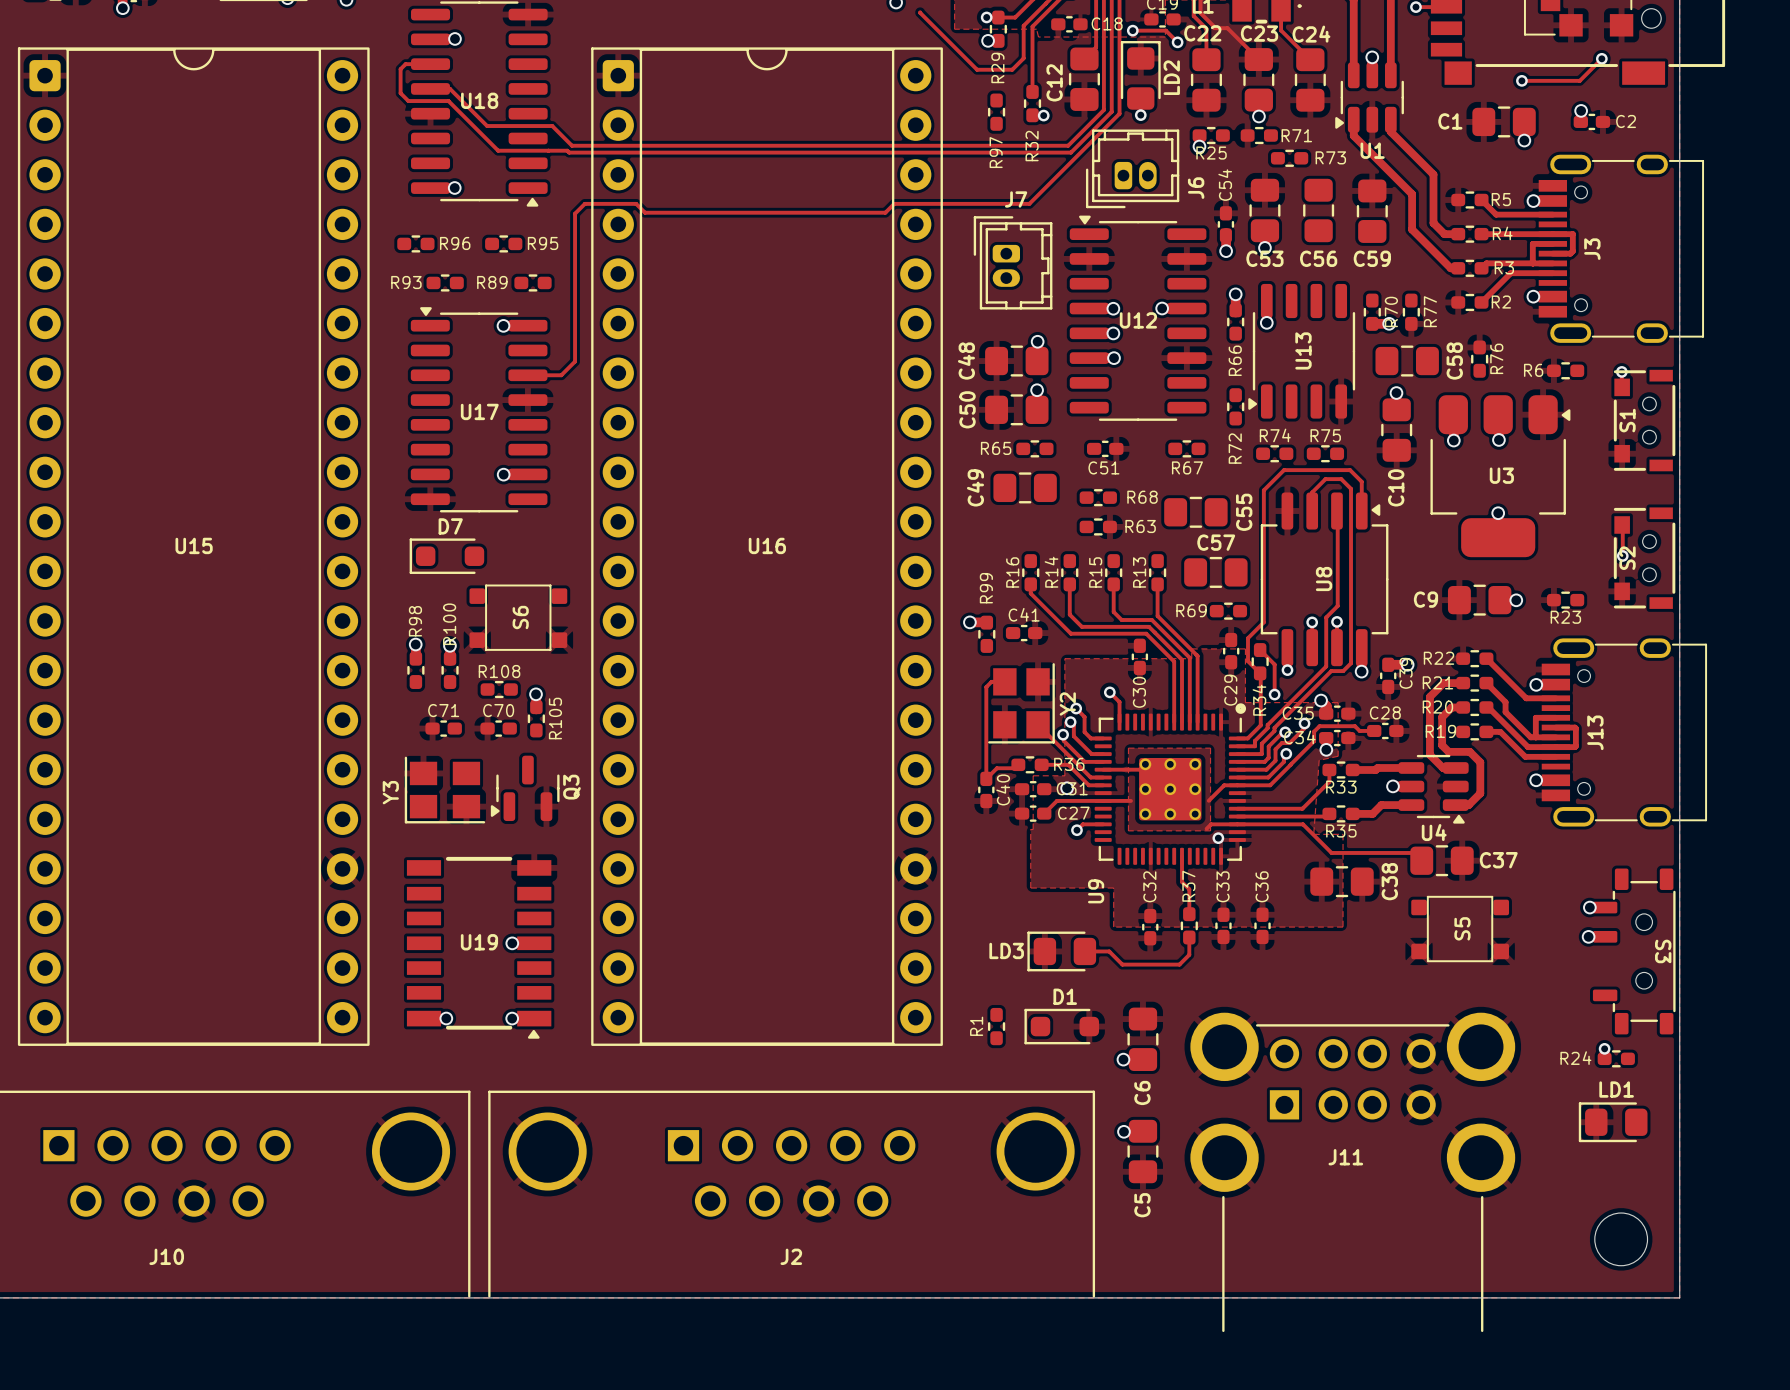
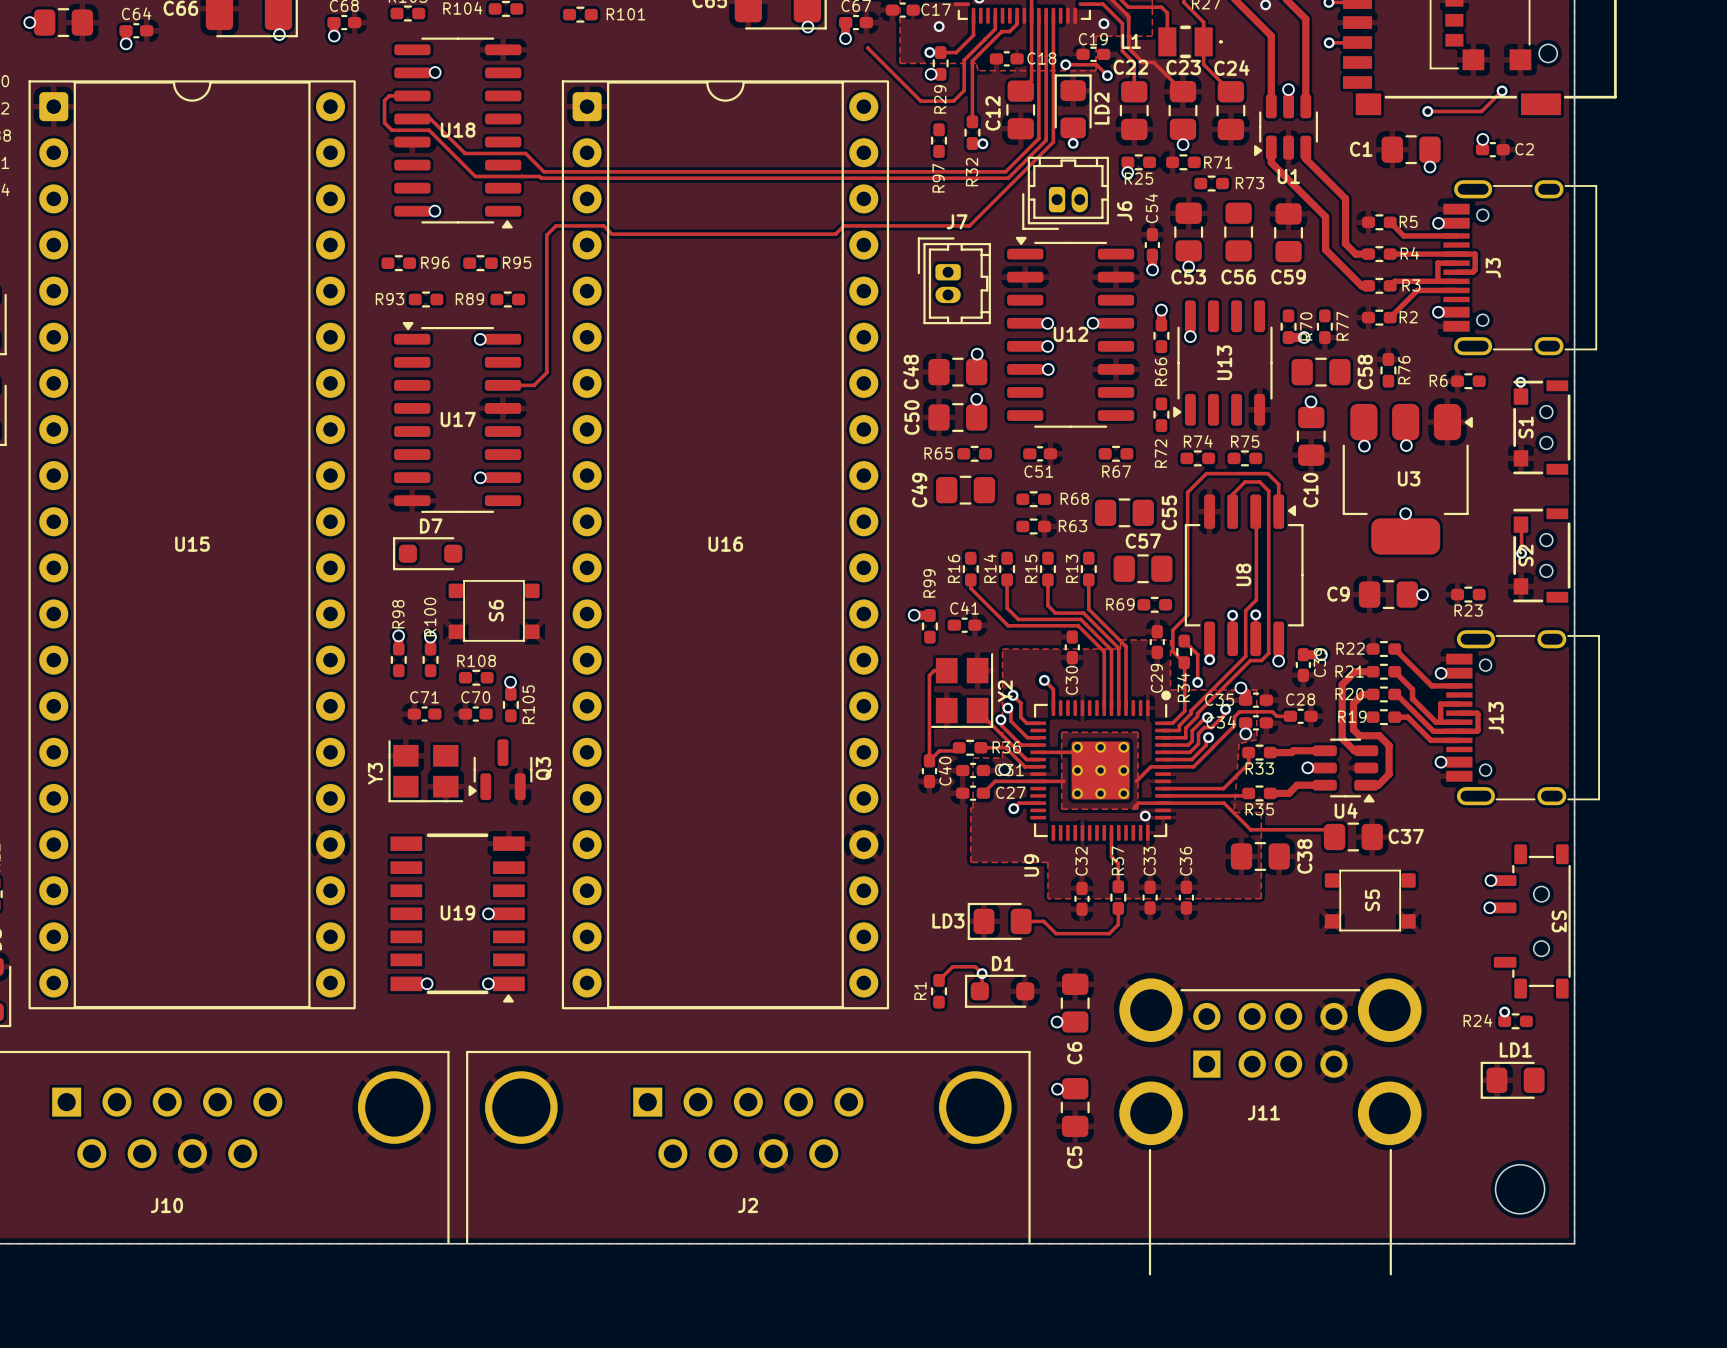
via: none -> (982, 973)
track: none -> (939, 980) (952, 966) (975, 966) (982, 973) (982, 989) (979, 991)

